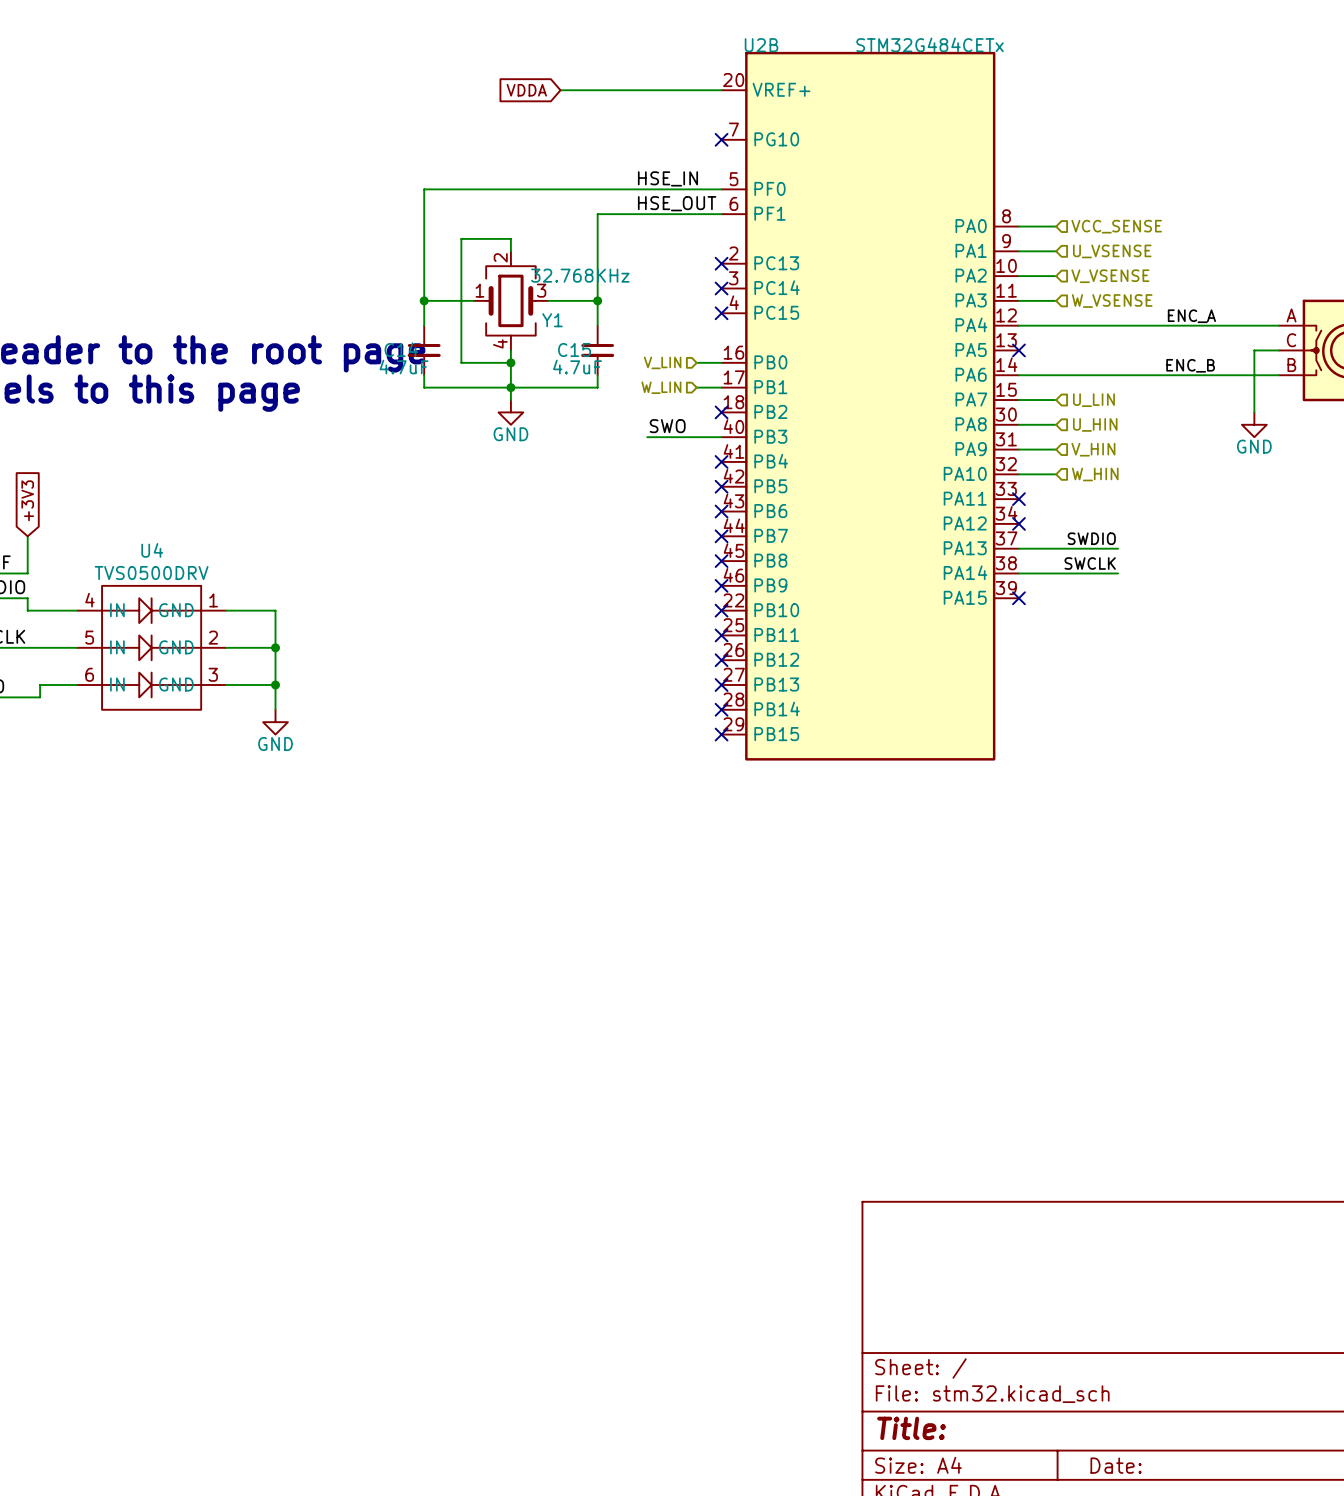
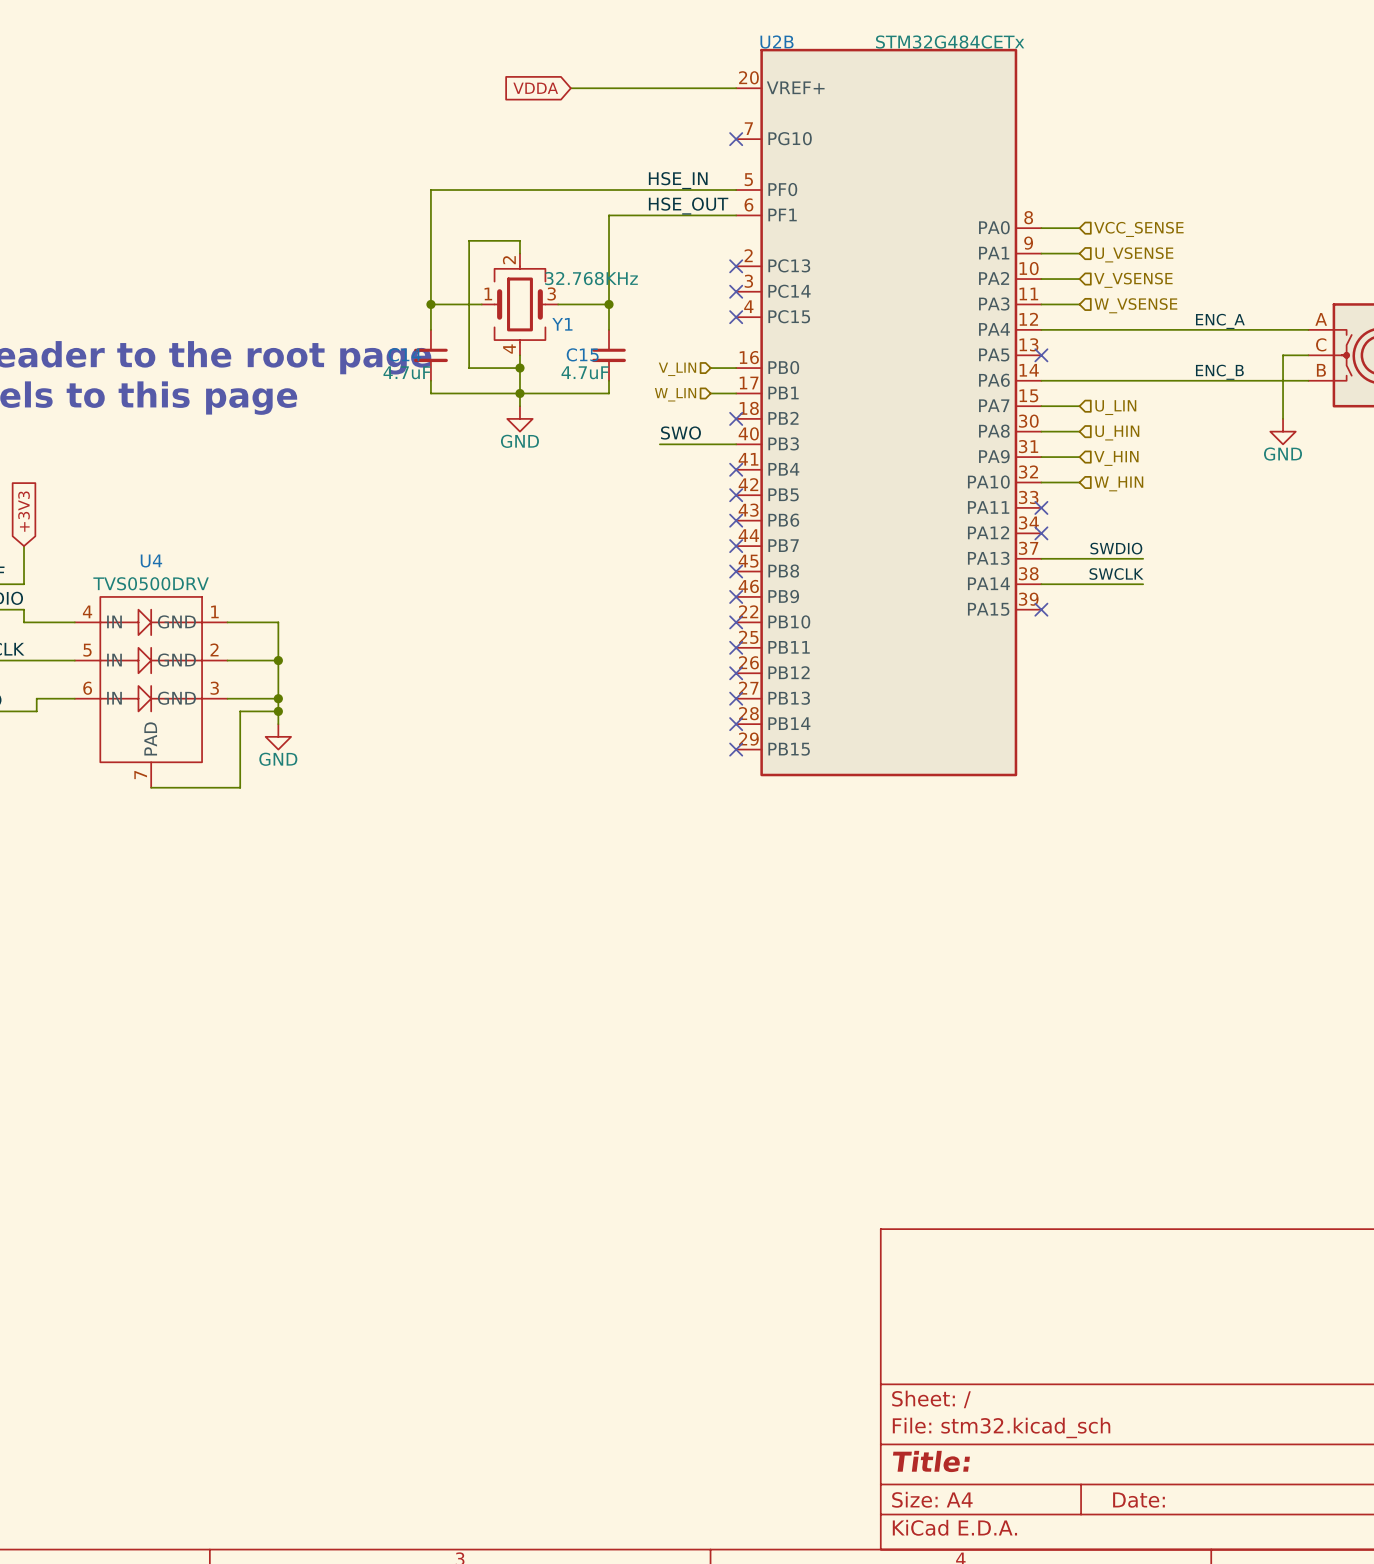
U4 symbol: [77, 585, 226, 710] -> [74, 596, 228, 788]
wire: none -> (278, 711) (240, 711) (240, 787) (151, 787)
junction: none -> (278, 711)

